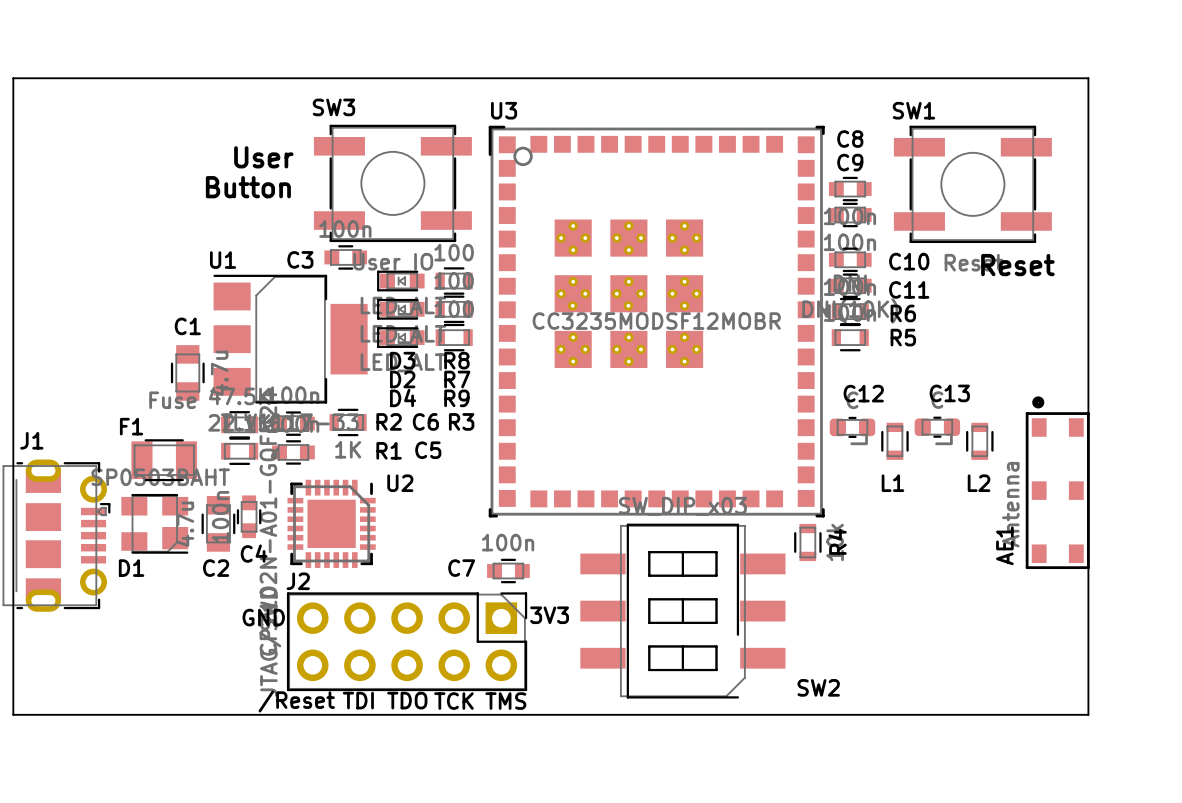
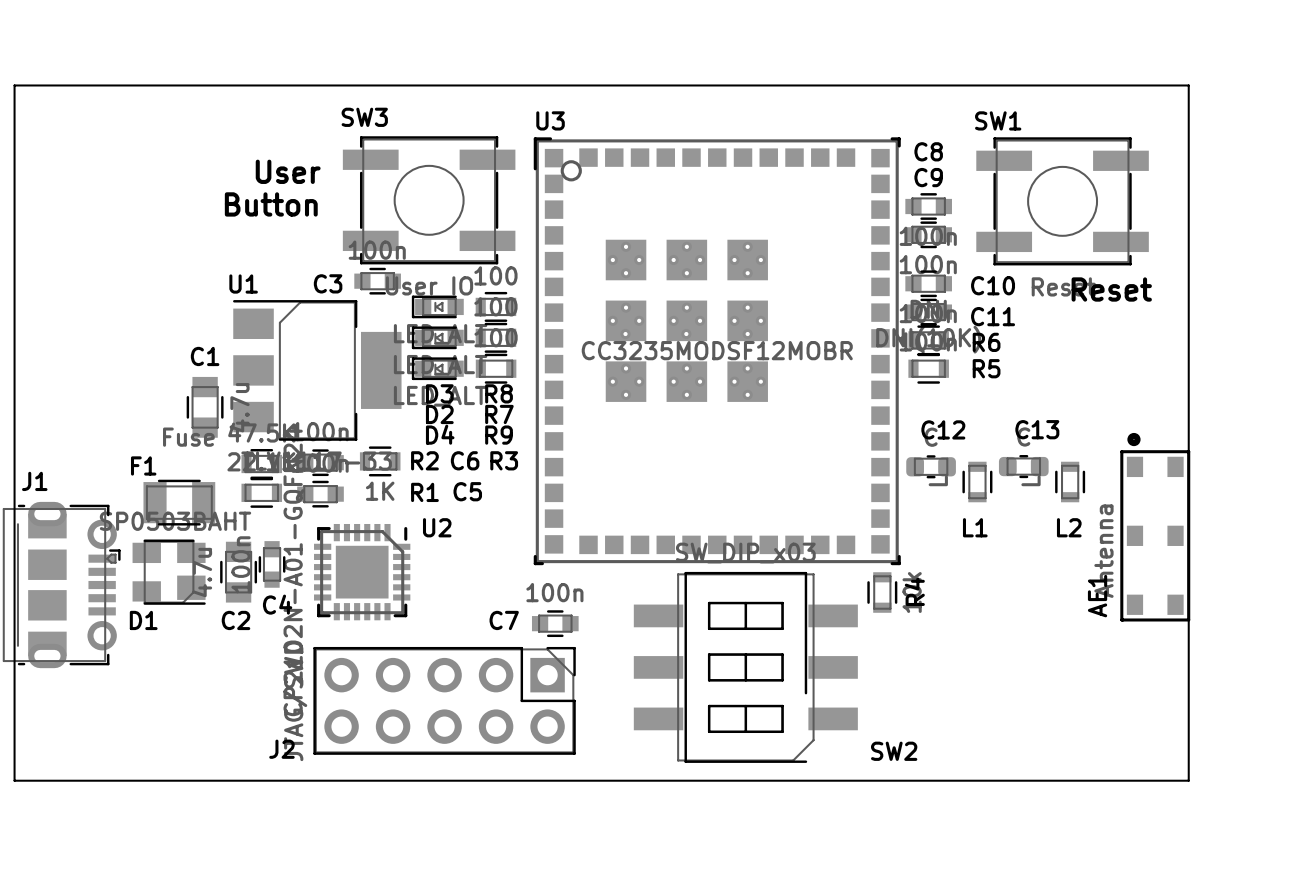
J2 name position: J2 (298, 581) -> J2 (281, 749)
text: 3V3 (549, 615) -> none
text: GND (263, 617) -> none
text: TDI (358, 700) -> none
text: TDO (407, 700) -> none
text: /Reset (296, 701) -> none
text: TCK (453, 701) -> none
text: TMS (505, 701) -> none

